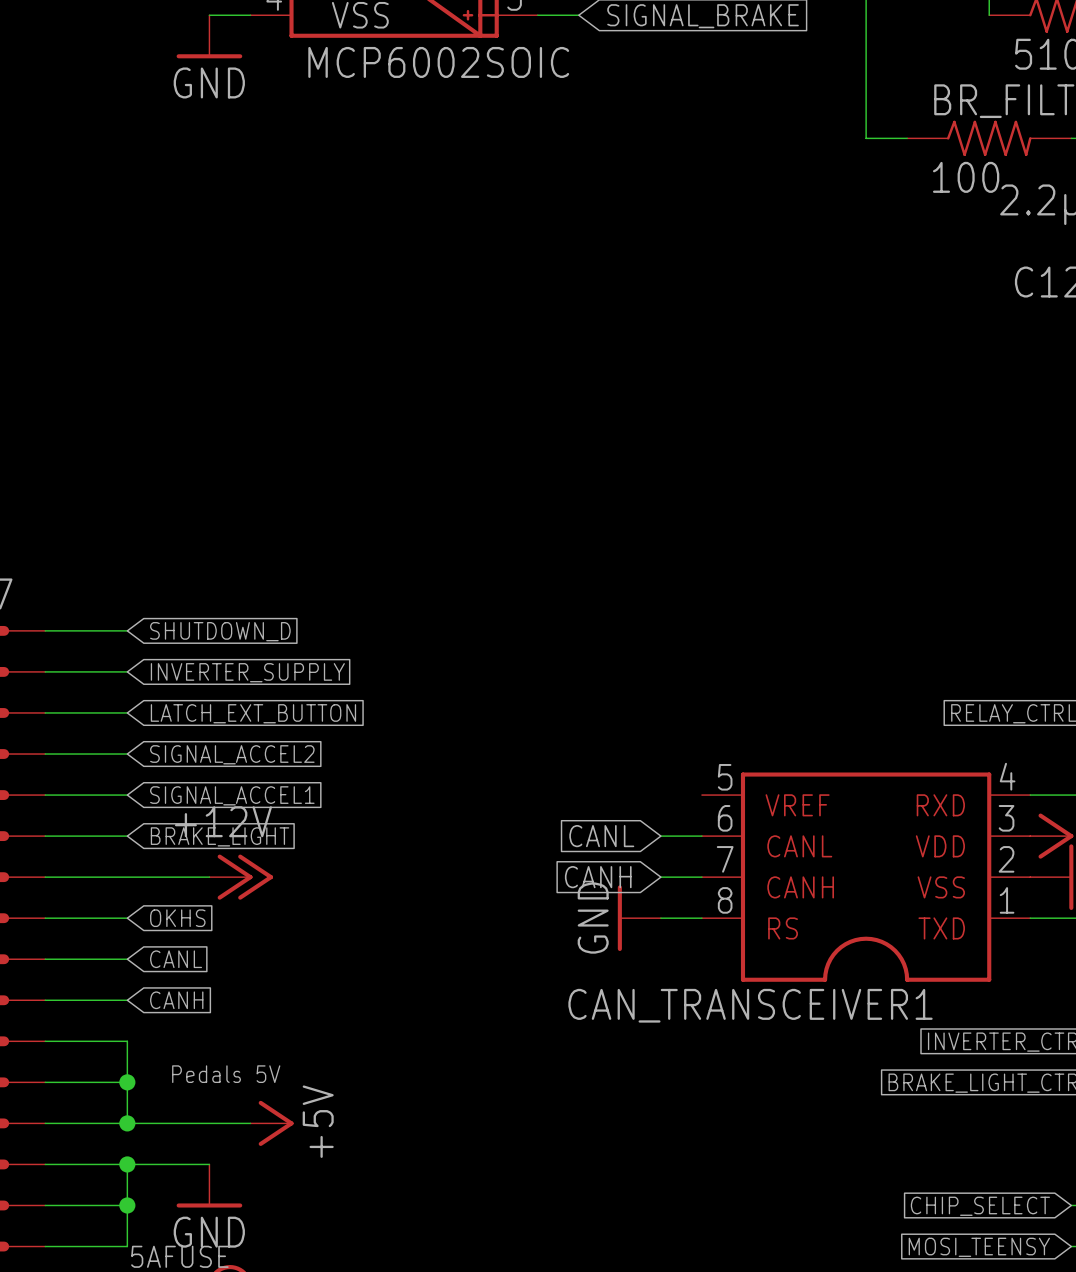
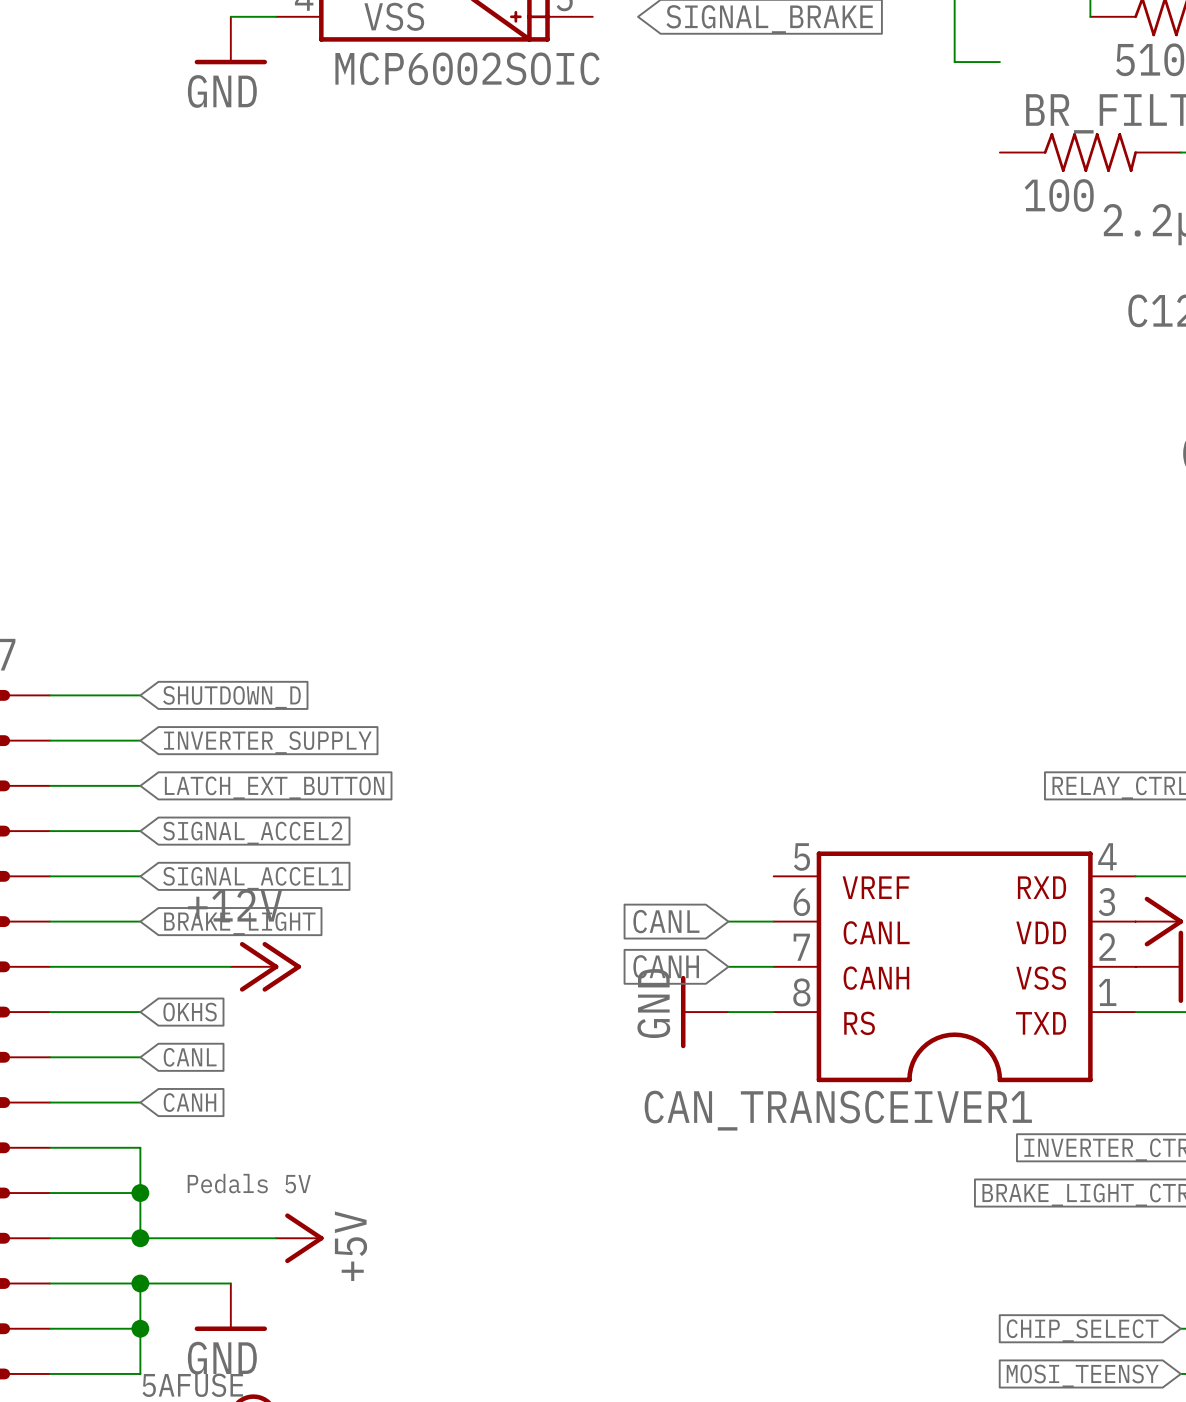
wire: (537, 15) (578, 15) -> none
wire: (866, 56) (866, 138) (907, 138) -> (954, 62) (999, 62)

